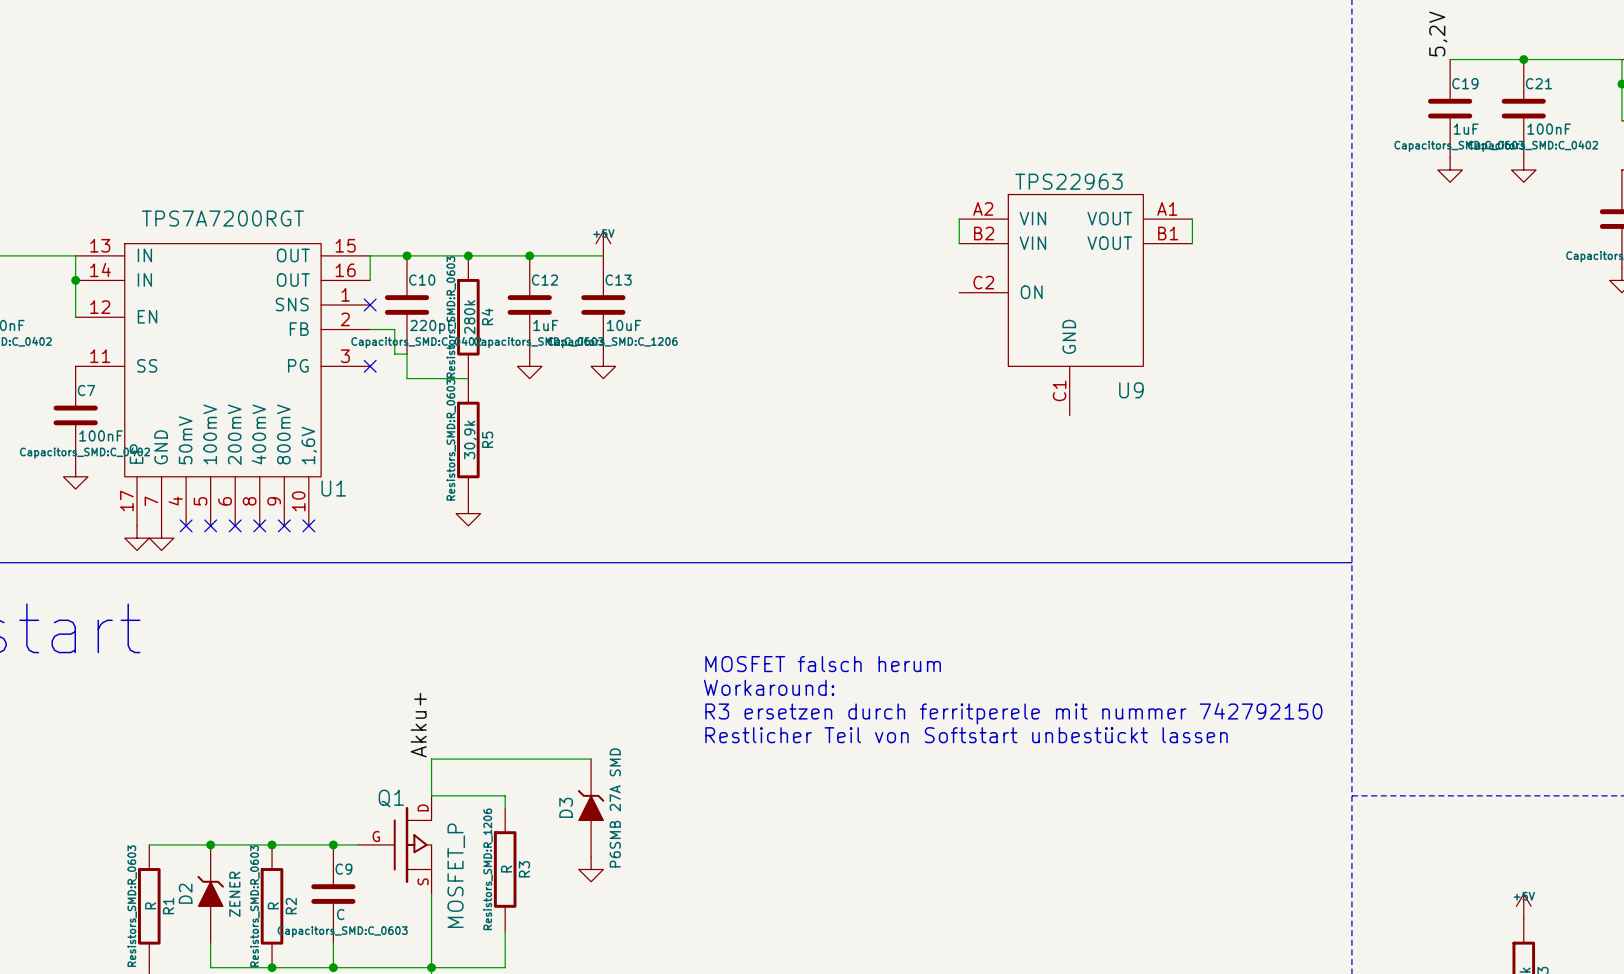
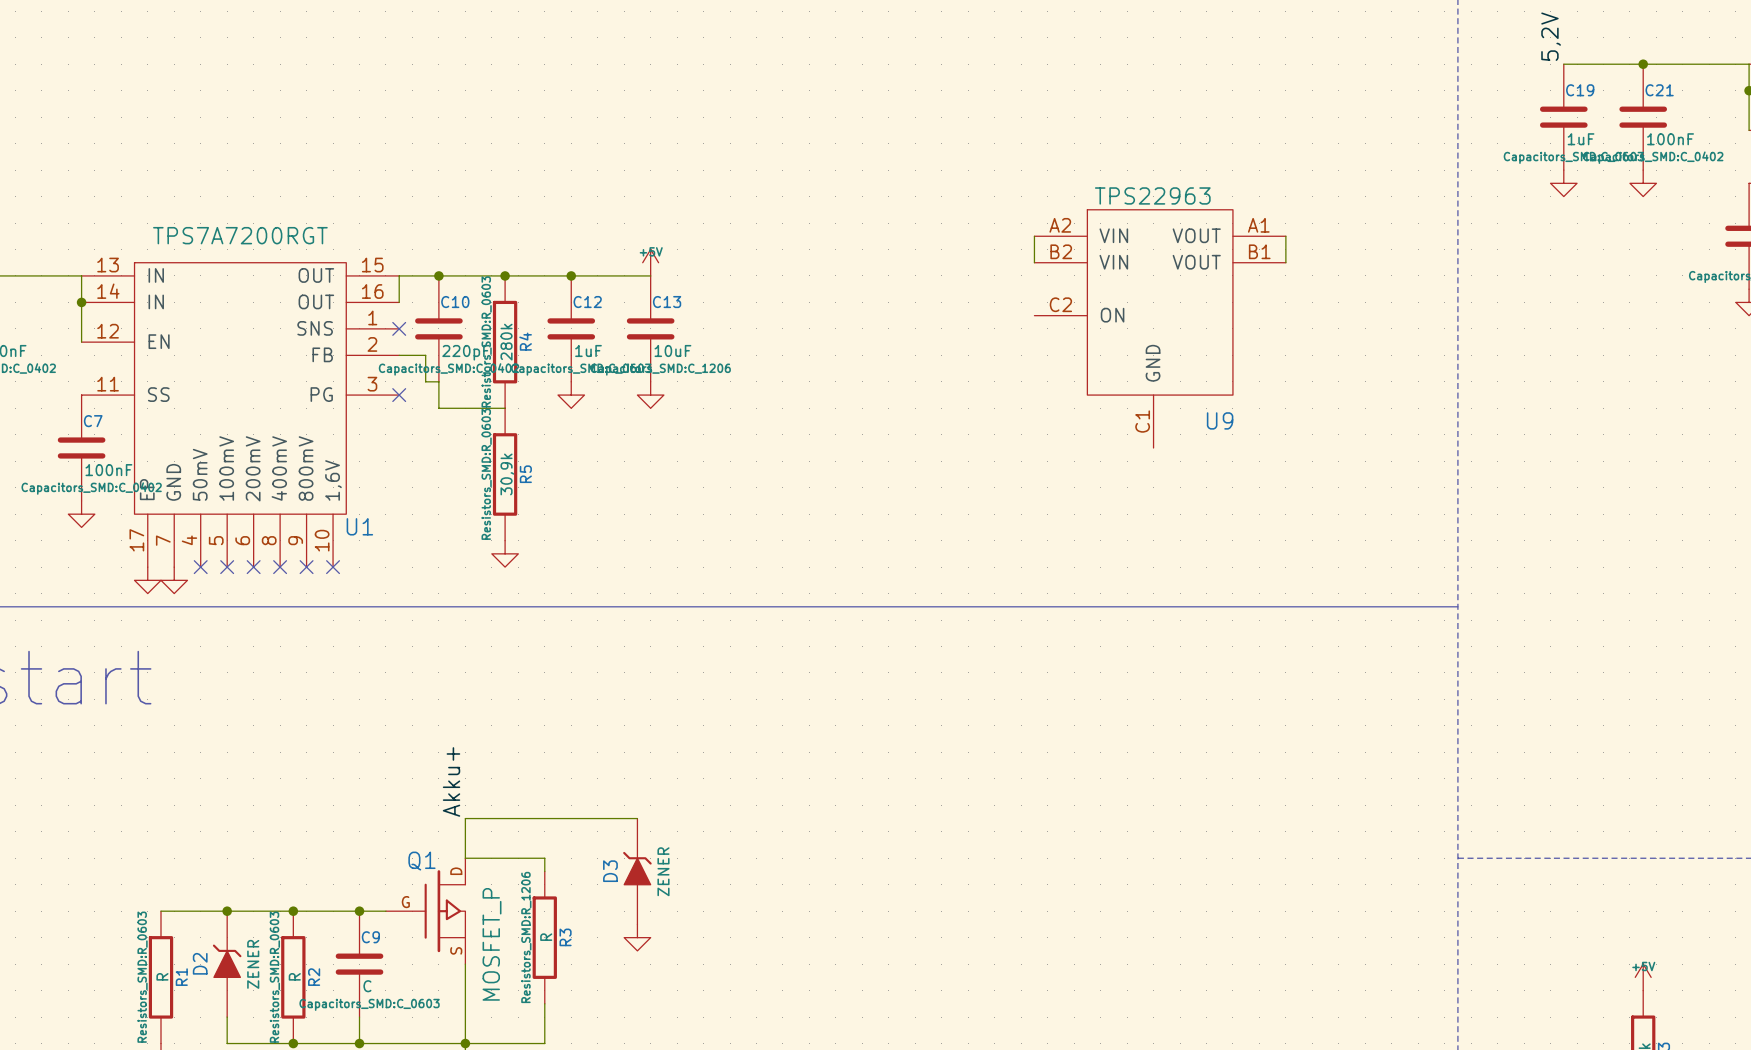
text: MOSFET falsch herum (823, 664) -> none
text: Workaround: (769, 687) -> none
text: R3 ersetzen durch ferritperele mit nummer 742792150 (1013, 713) -> none
text: Restlicher Teil von Softstart unbestückt lassen (966, 735) -> none
D3 value: P6SMB 27A SMD (615, 807) -> ZENER (663, 871)

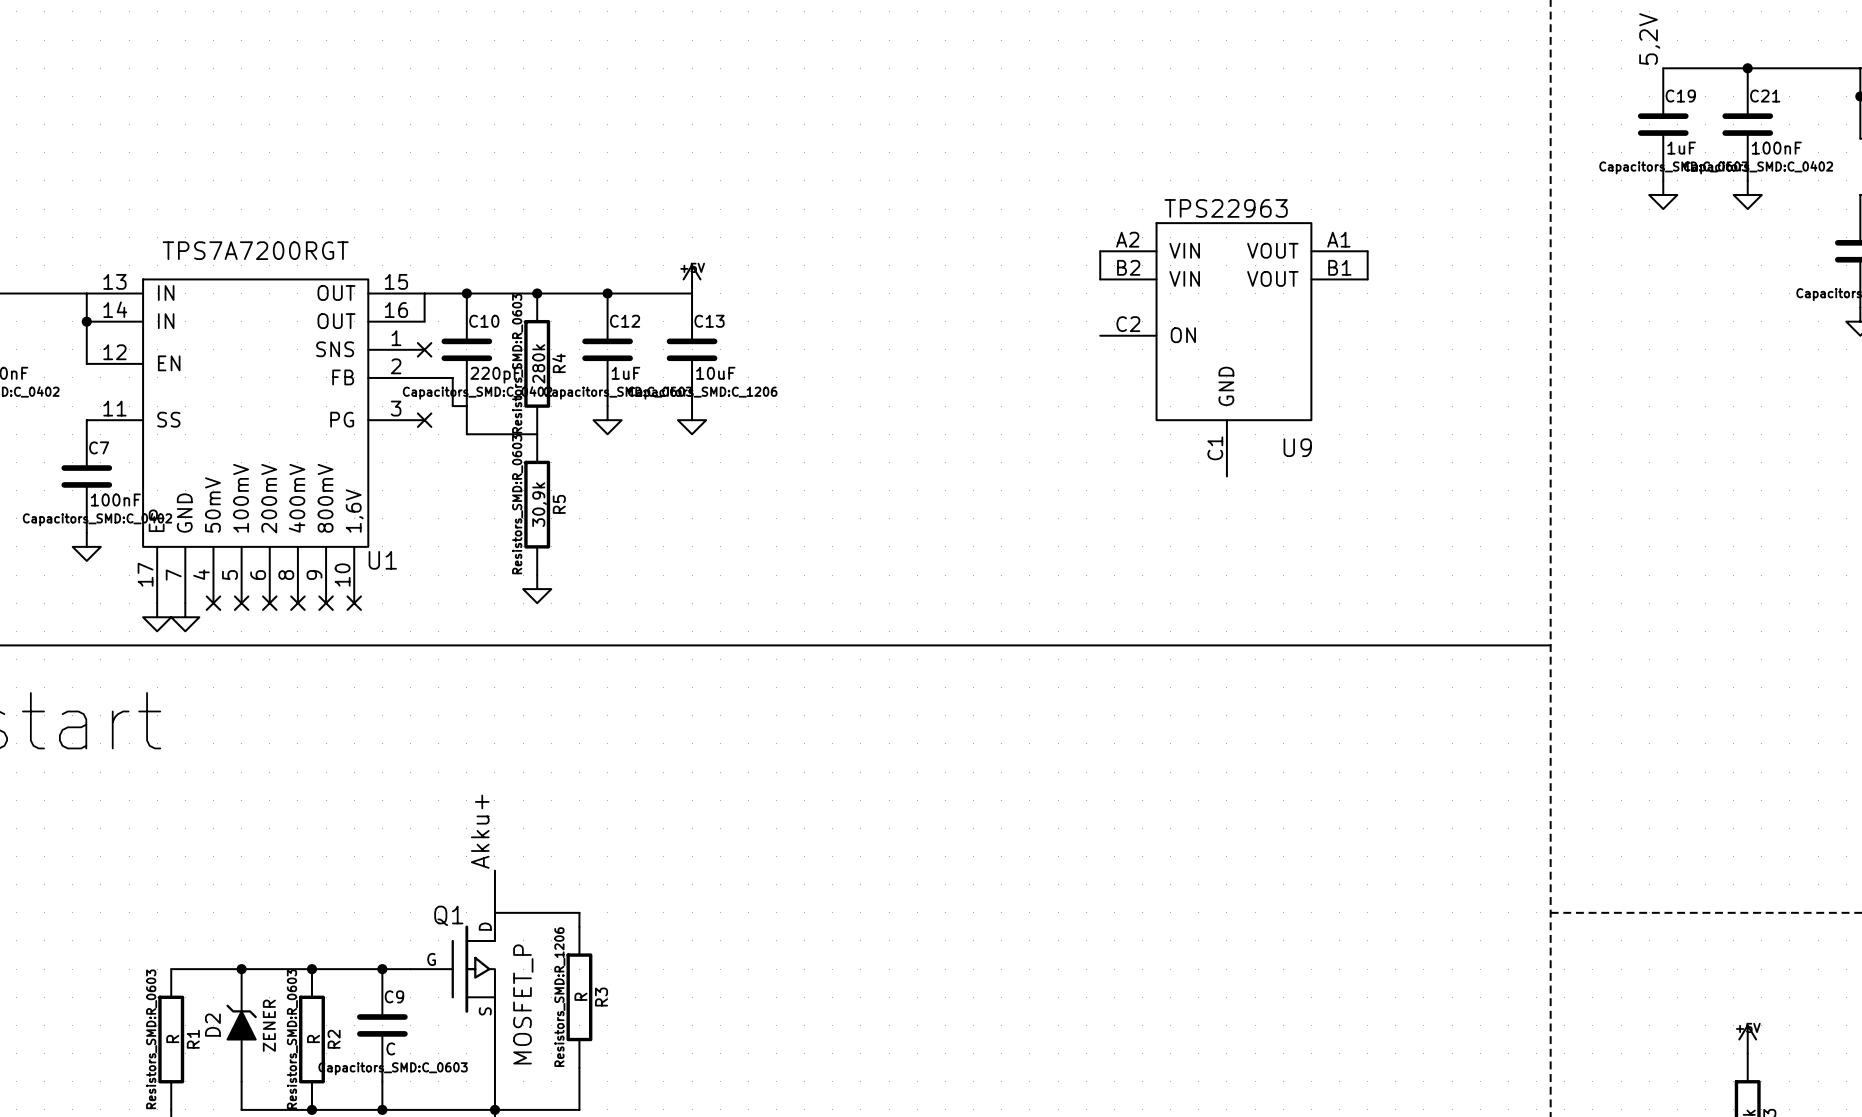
wire: (465, 818) (637, 818) -> none
D3: ZENER (637, 871) -> none
power symbol: (637, 937) -> none

